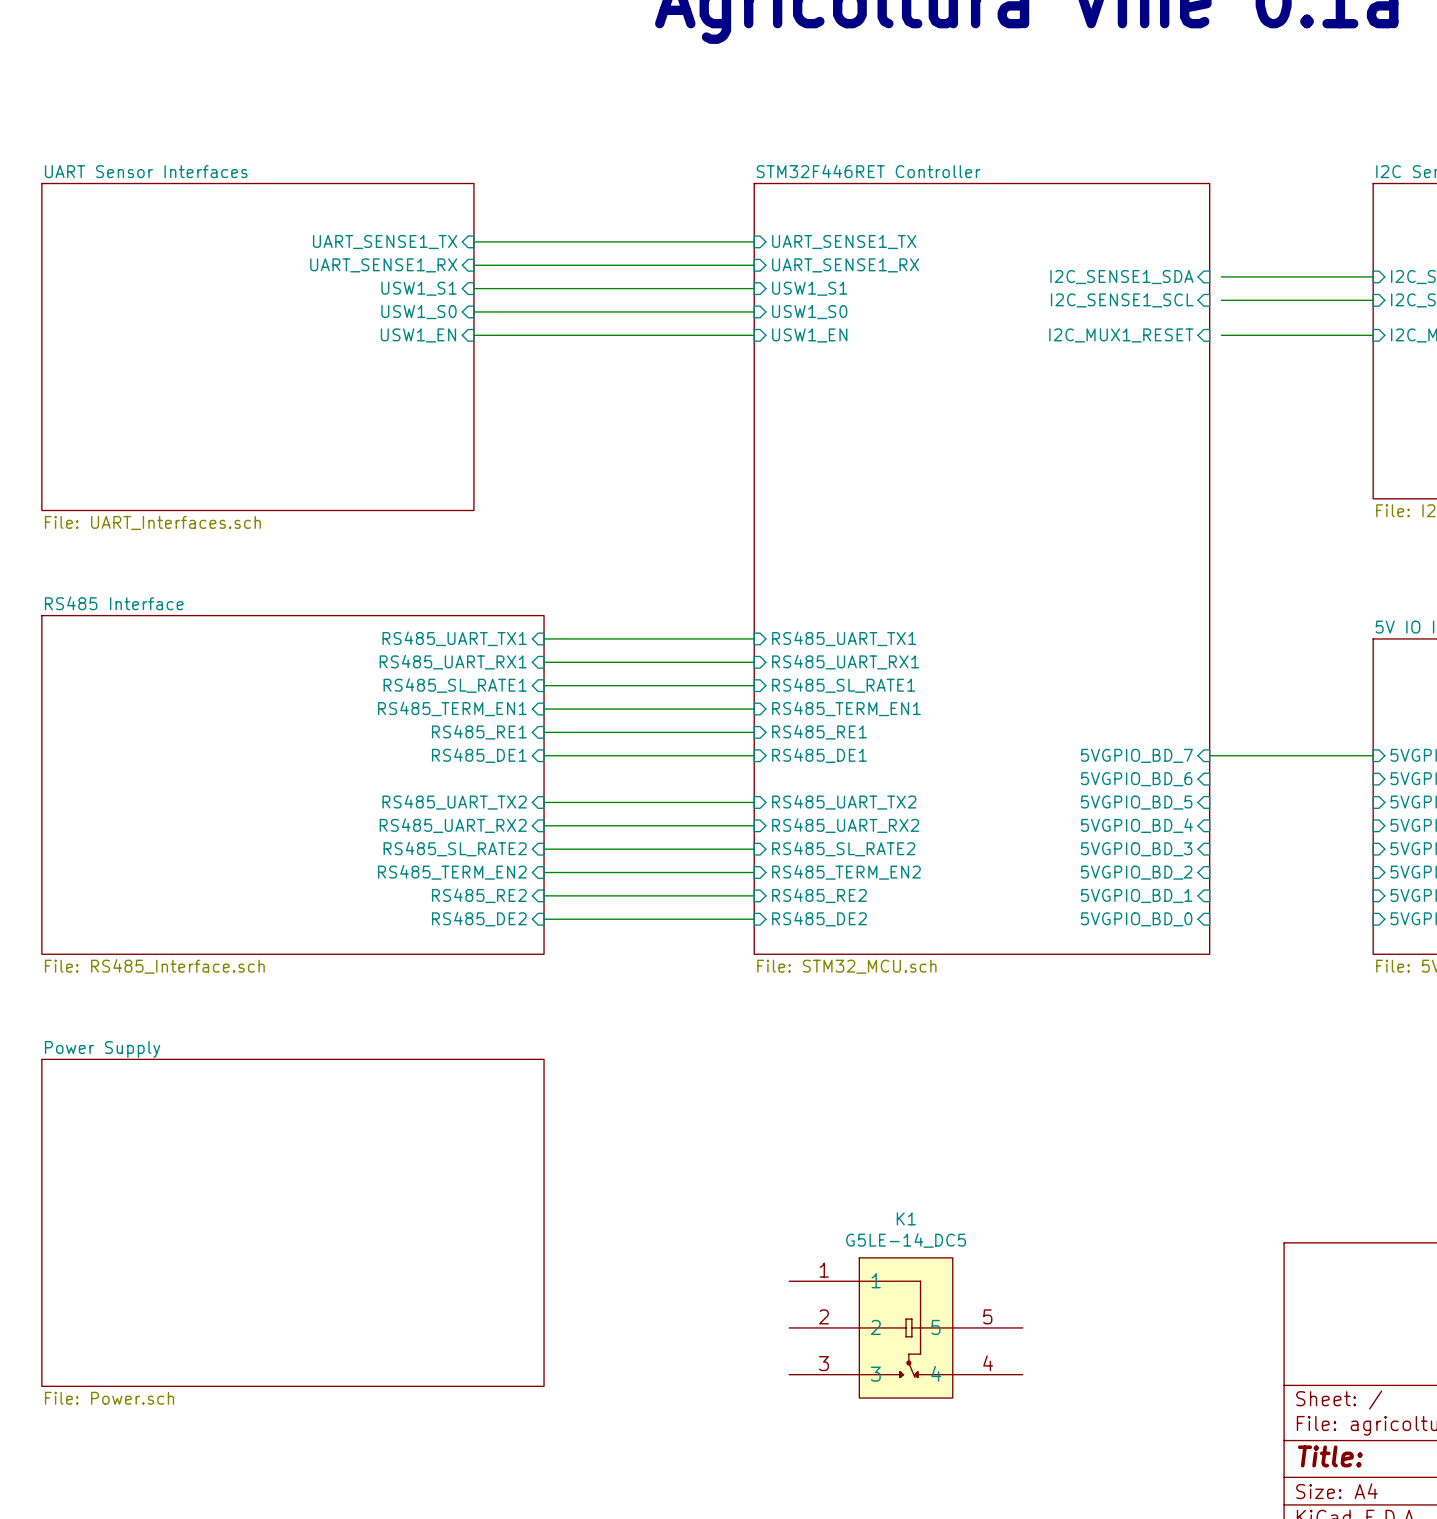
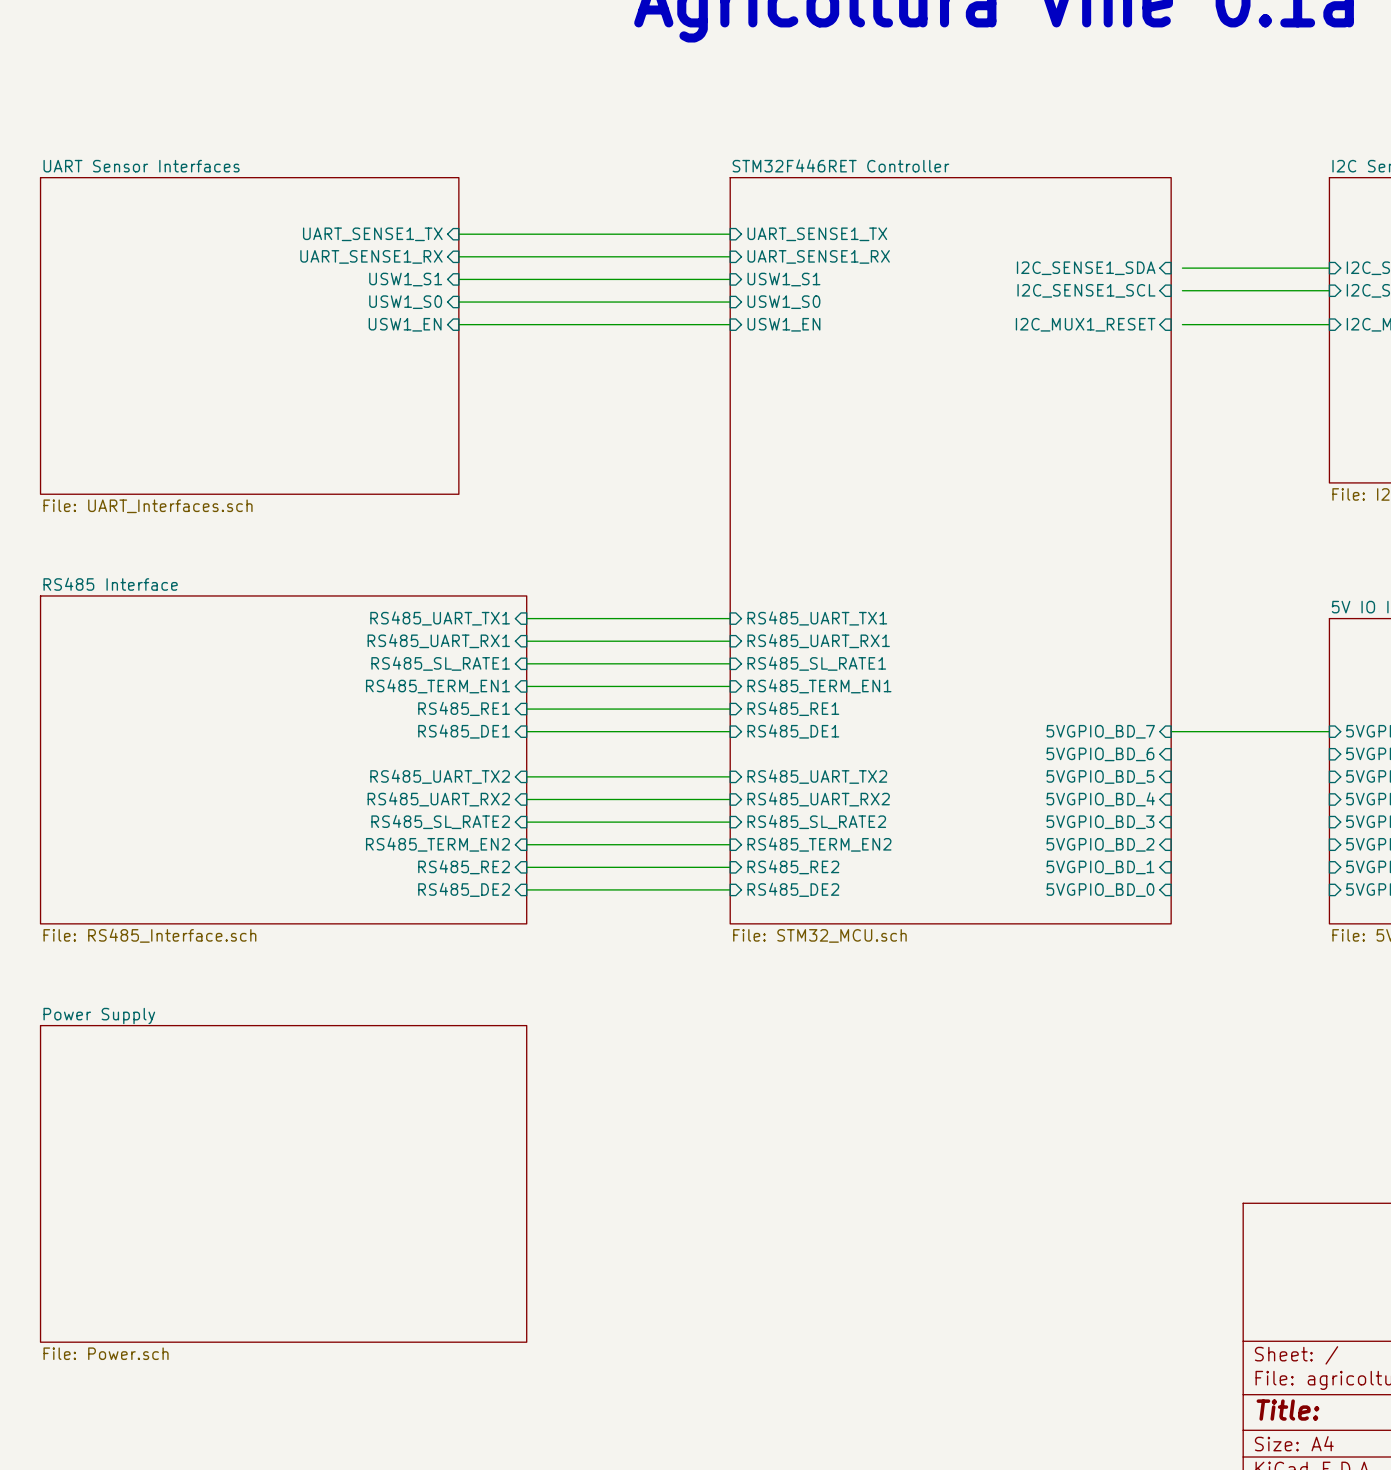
K1: G5LE-14_DC5 (906, 1327) -> none

